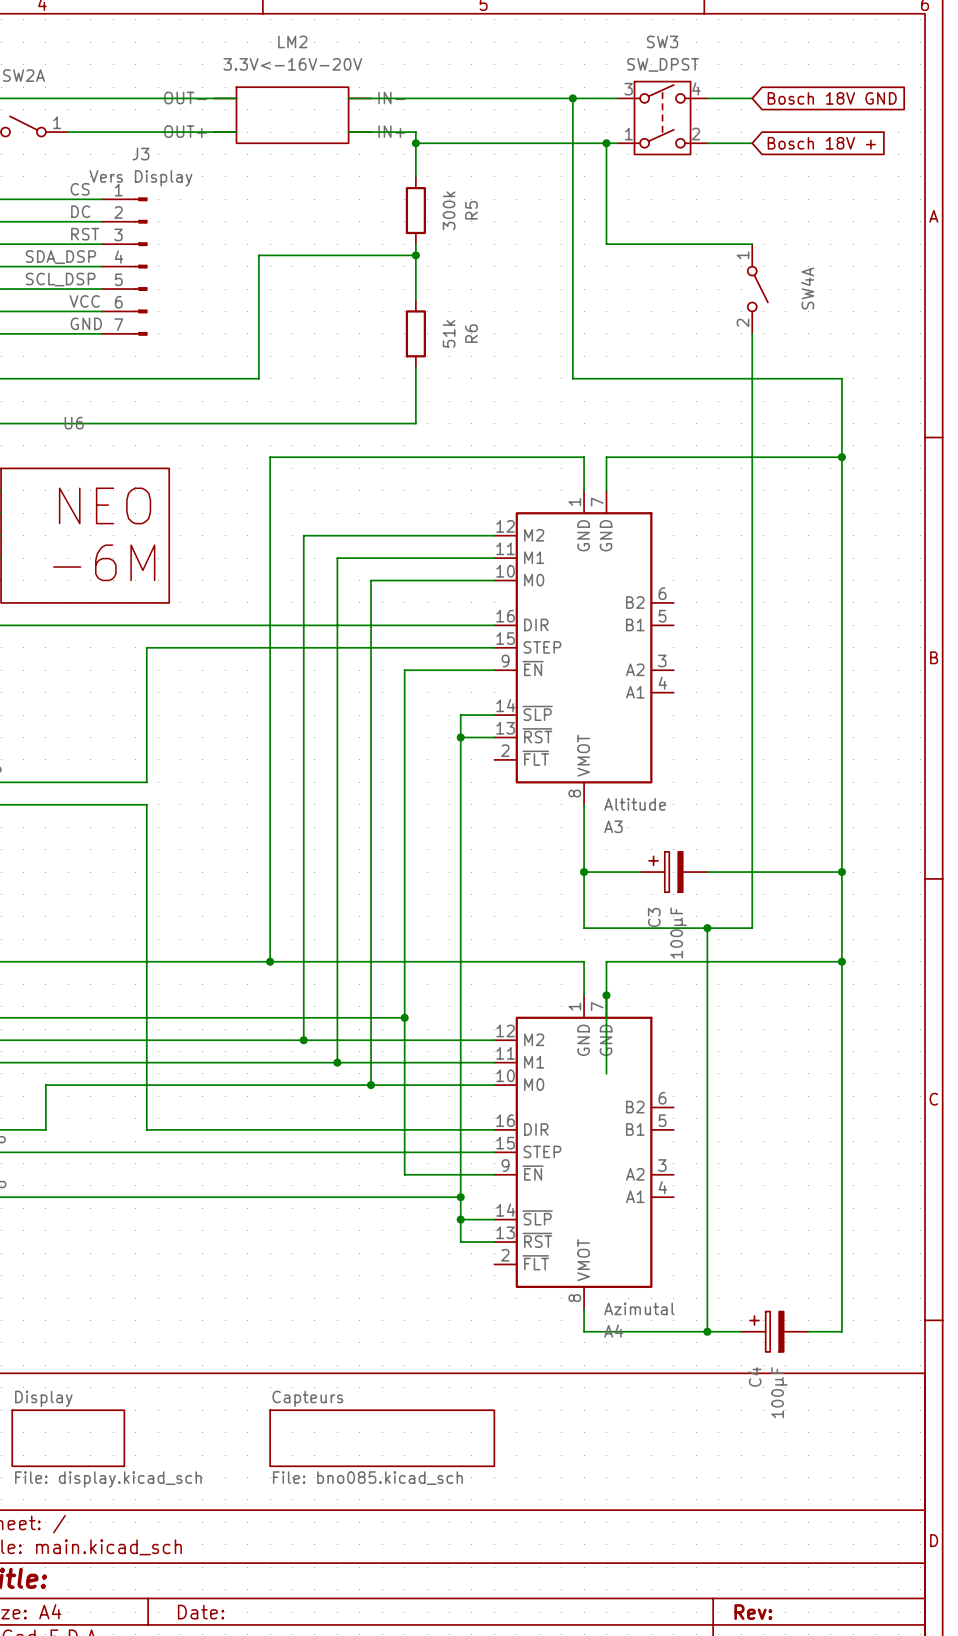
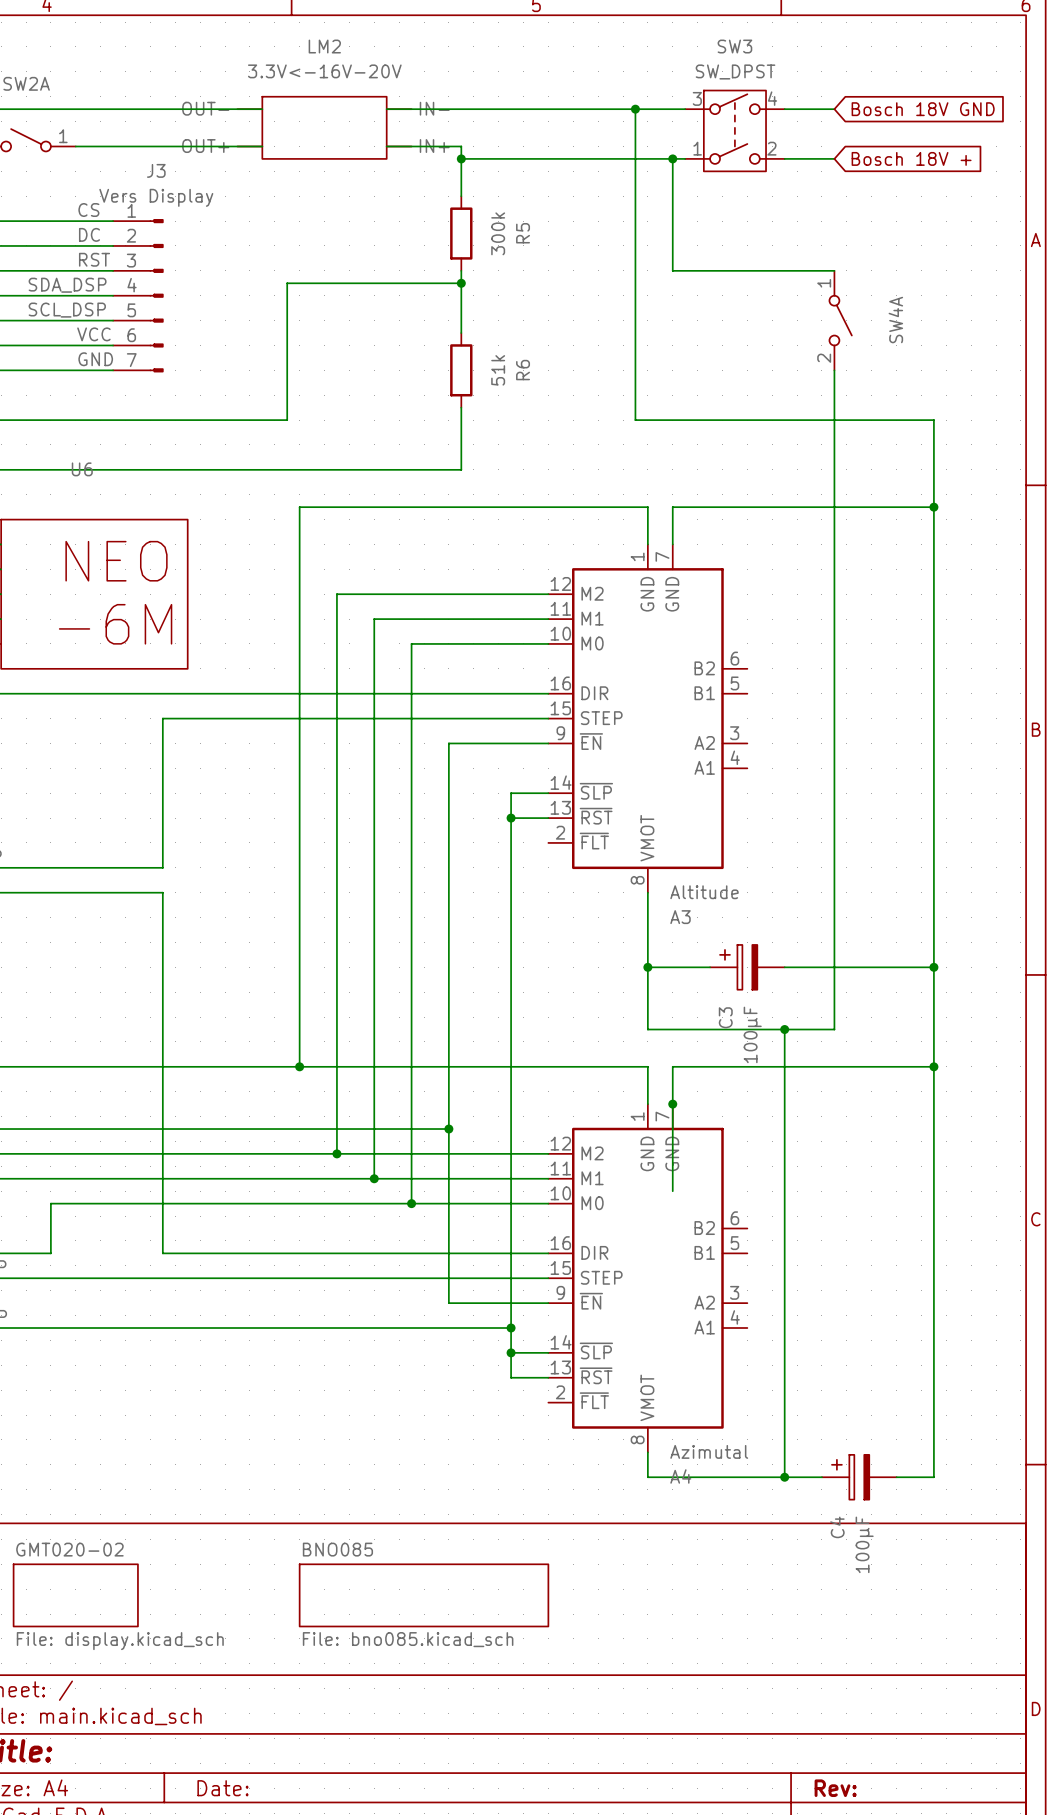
sheet Display name: Display (43, 1398) -> GMT020-02 (69, 1549)
sheet Capteurs name: Capteurs (307, 1398) -> BNO085 (337, 1549)

